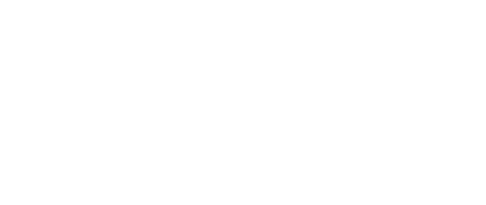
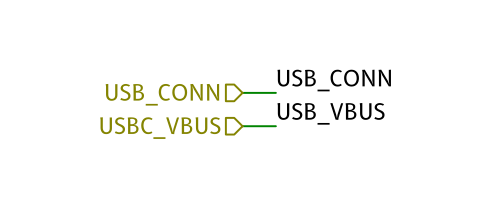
label: none -> USB_CONN (334, 80)
wire: none -> (242, 92) (275, 92)
hierarchical label: none -> USB_CONN (162, 94)
label: none -> USB_VBUS (331, 113)
wire: none -> (242, 126) (275, 126)
hierarchical label: none -> USBC_VBUS (160, 128)

